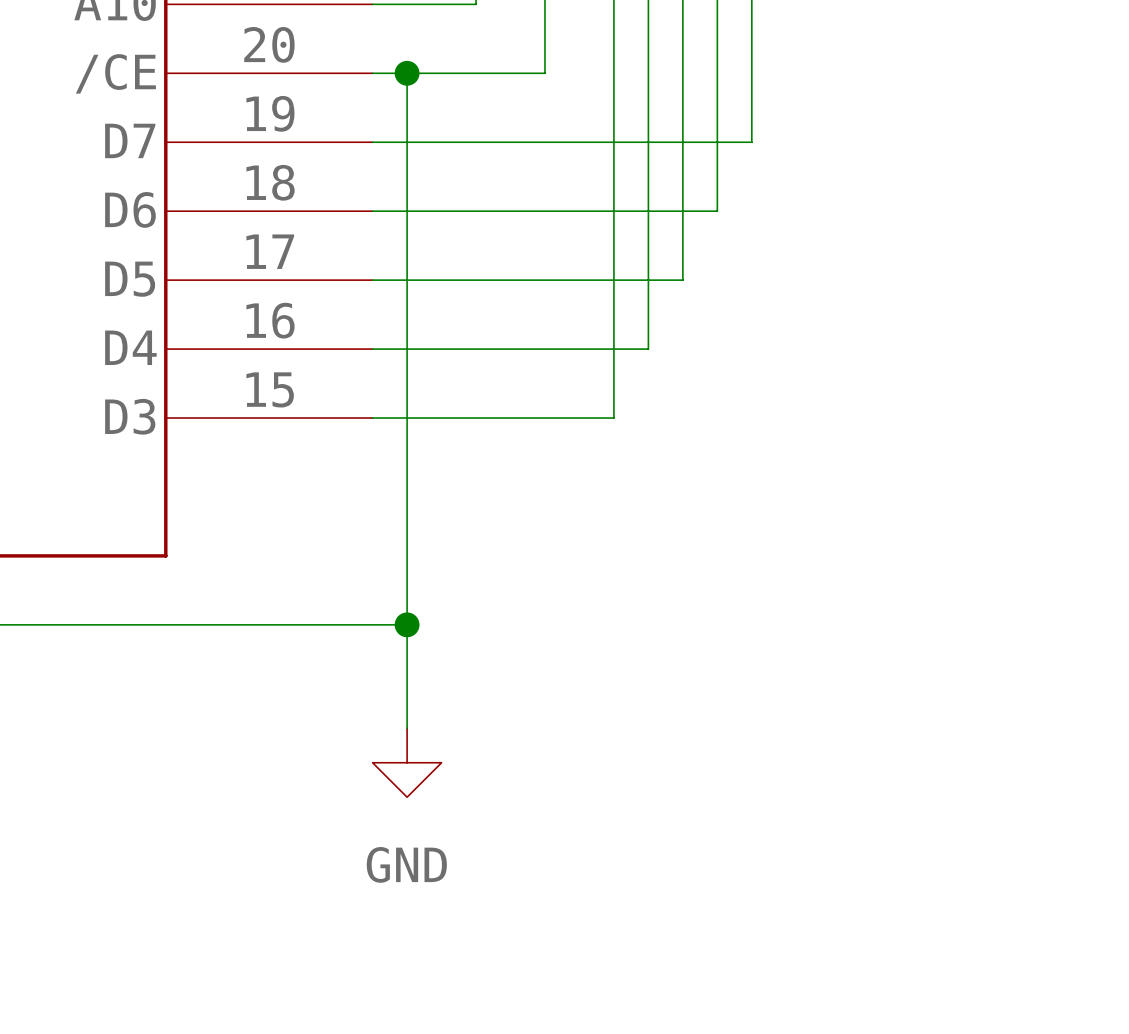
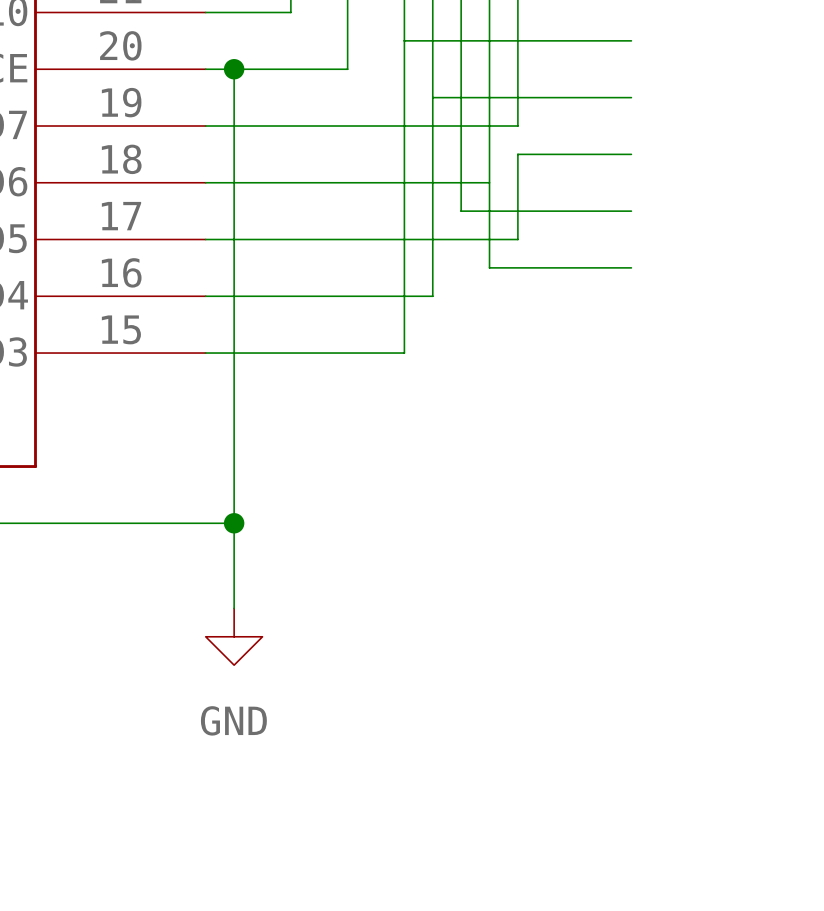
wire: none -> (404, 40) (631, 40)
wire: none -> (432, 97) (631, 97)
wire: none -> (631, 154) (517, 154) (517, 239) (461, 239)
wire: none -> (489, 182) (489, 267) (631, 267)
wire: (682, 245) (682, 280) -> (461, 211) (631, 211)

